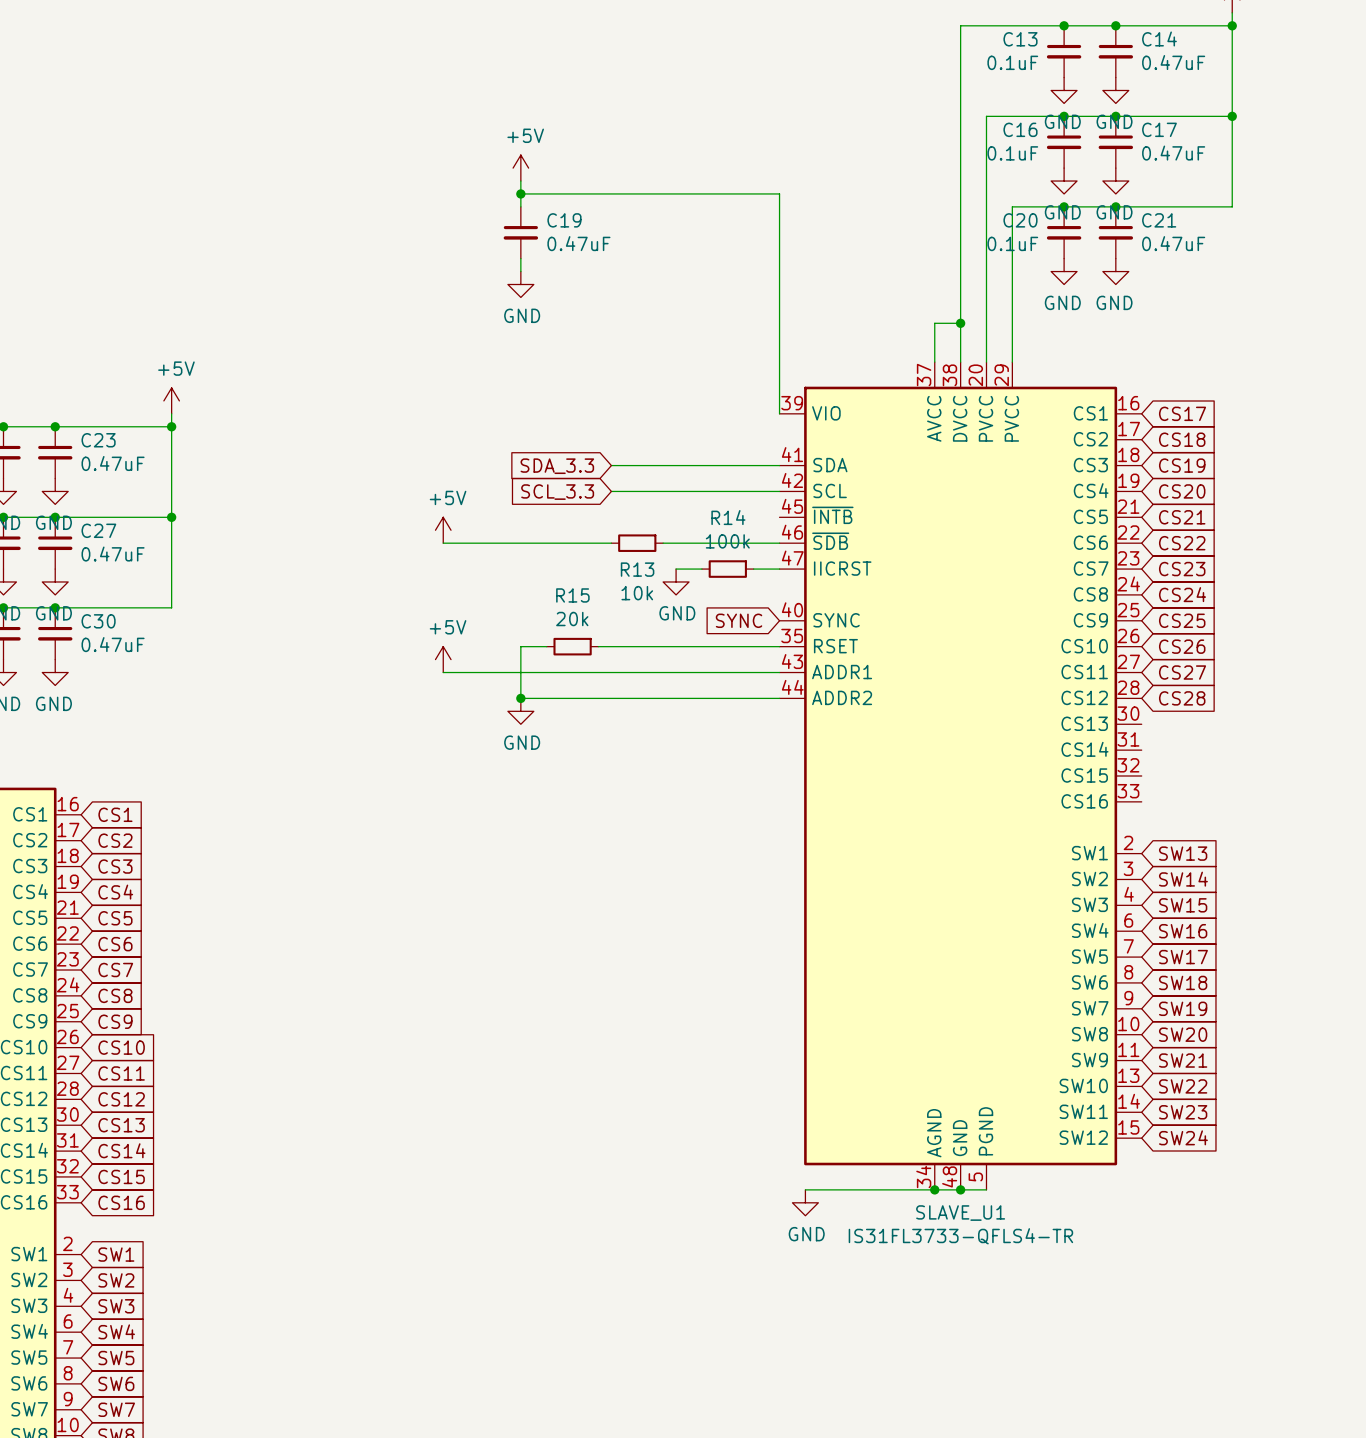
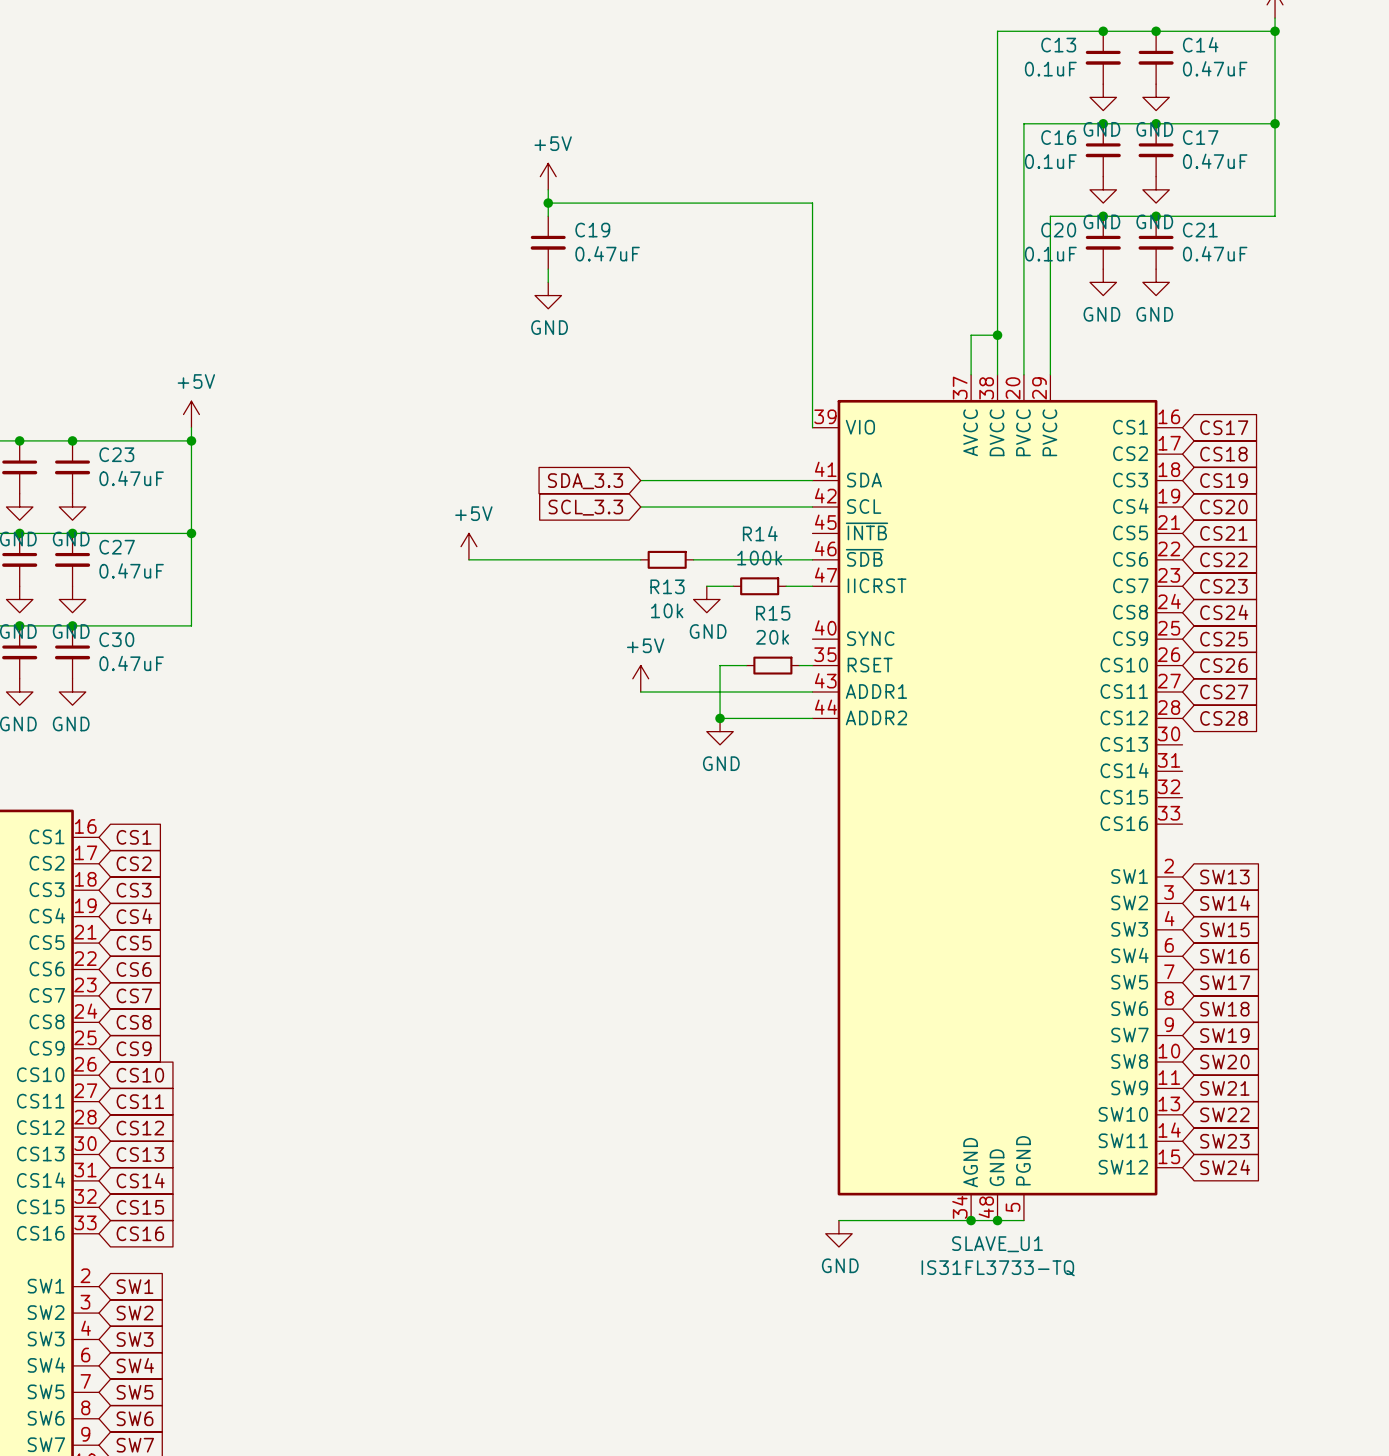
global label: SYNC (739, 620) -> none
wire: (546, 646) (520, 646) (520, 698) (689, 698) -> none
R15 position: (572, 646) -> (772, 665)
wire: (598, 646) (689, 646) -> (720, 718) (720, 665)
wire: (714, 646) (766, 646) -> none
power symbol position: +5V (443, 659) -> +5V (640, 678)
wire: (443, 672) (611, 672) -> none
junction: (520, 698) -> none
junction: none -> (720, 718)
power symbol position: GND (520, 711) -> GND (720, 731)
SLAVE_U1 value: IS31FL3733-QFLS4-TR (960, 1236) -> IS31FL3733-TQ (998, 1268)

